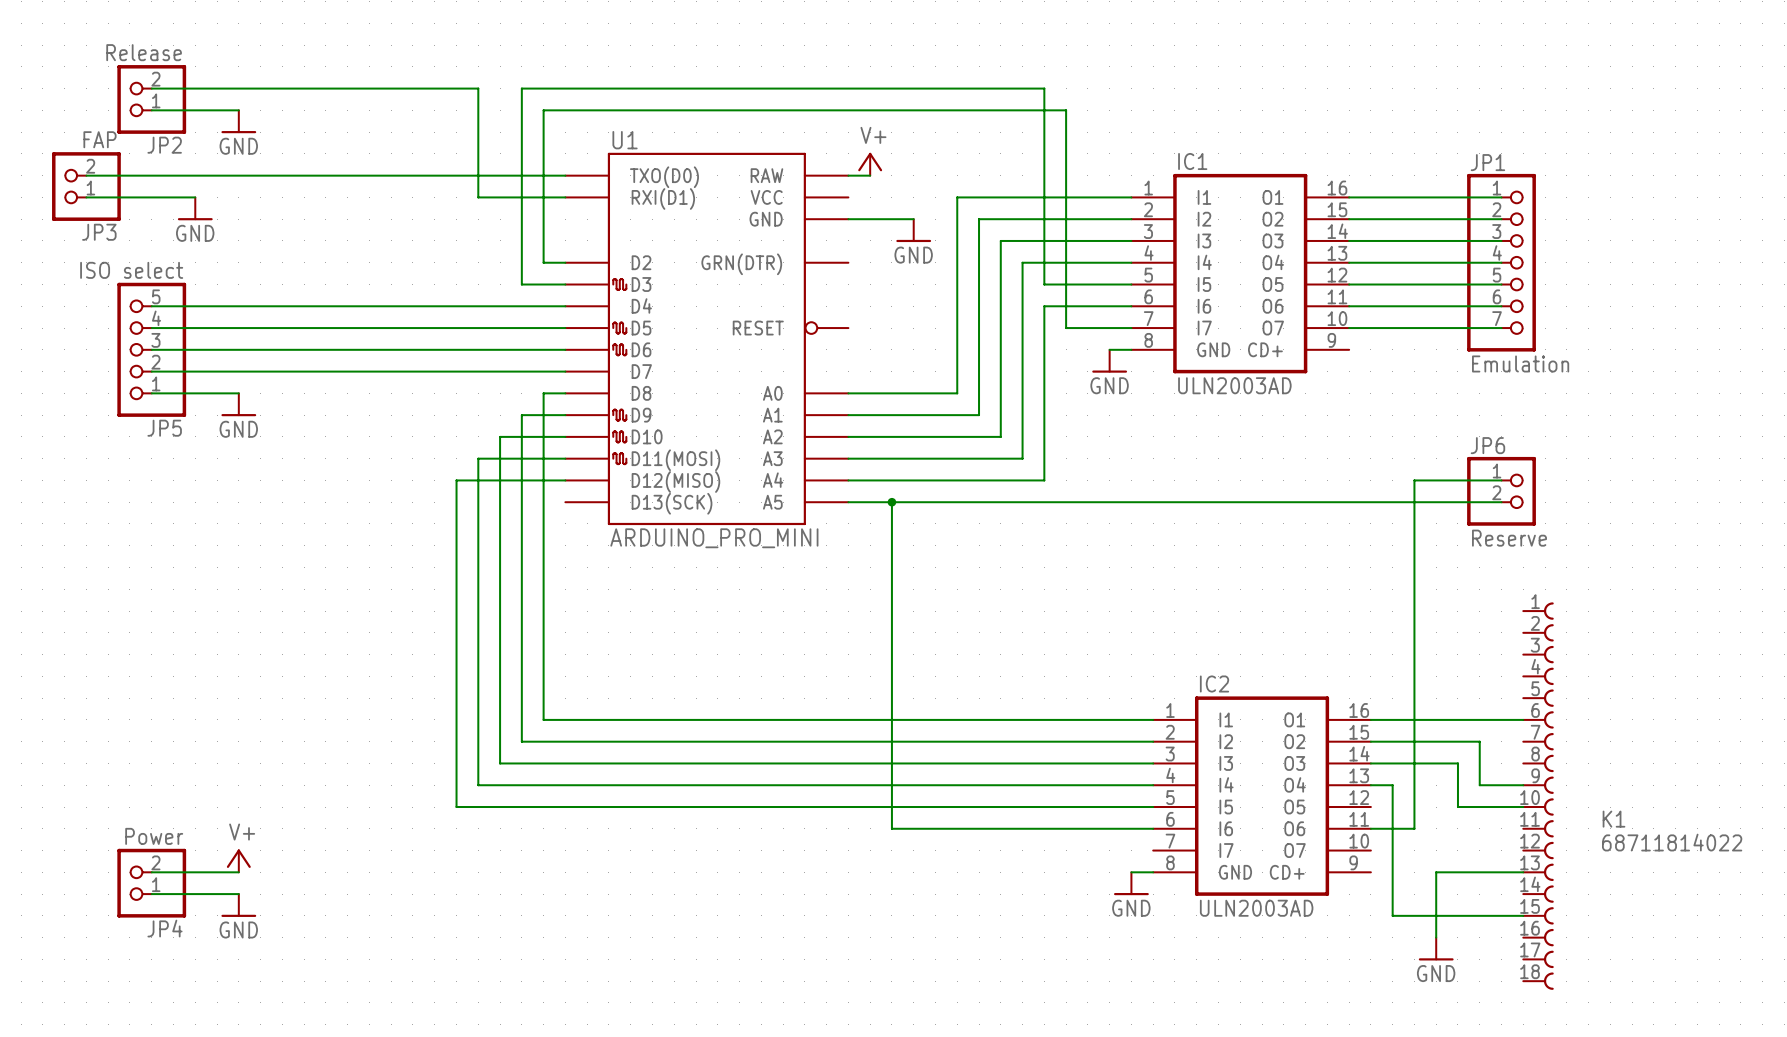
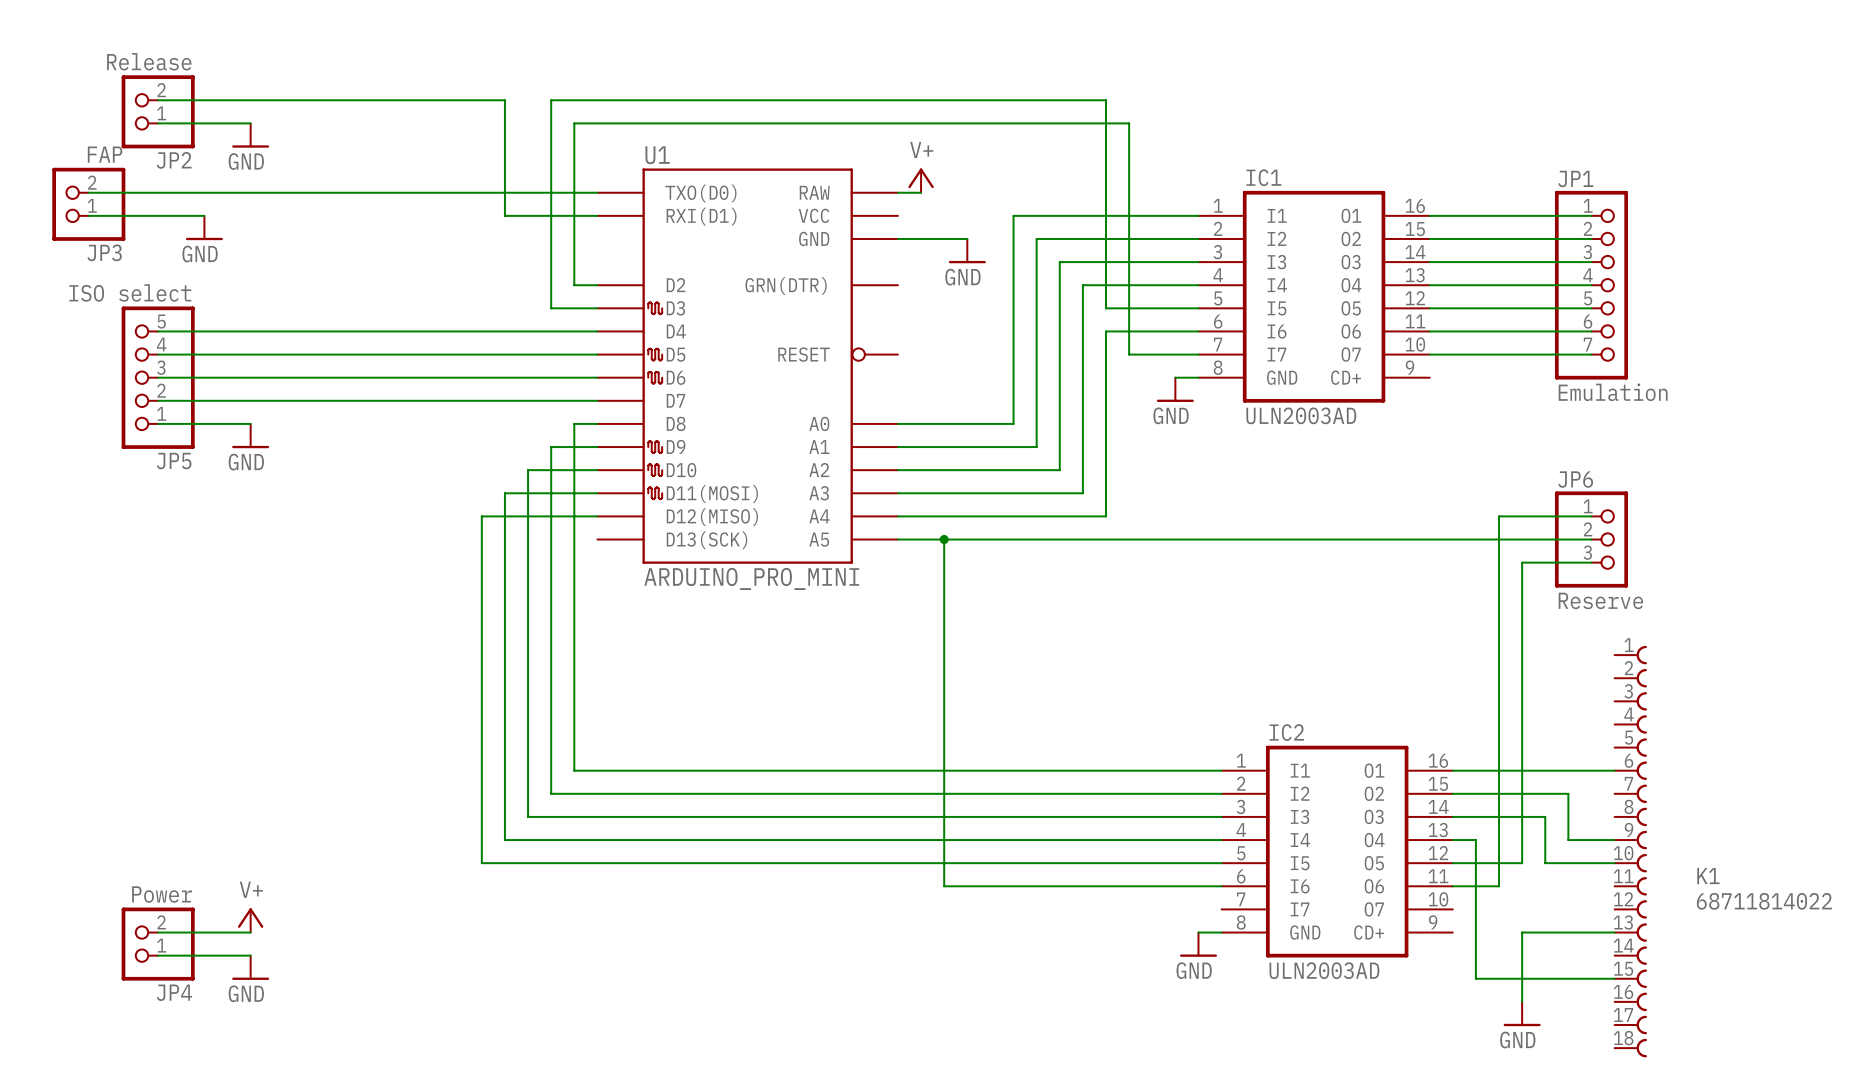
JP6 symbol: [1467, 456, 1536, 526] -> [1554, 491, 1629, 588]
wire: none -> (1591, 562) (1522, 562) (1522, 863) (1452, 863)

